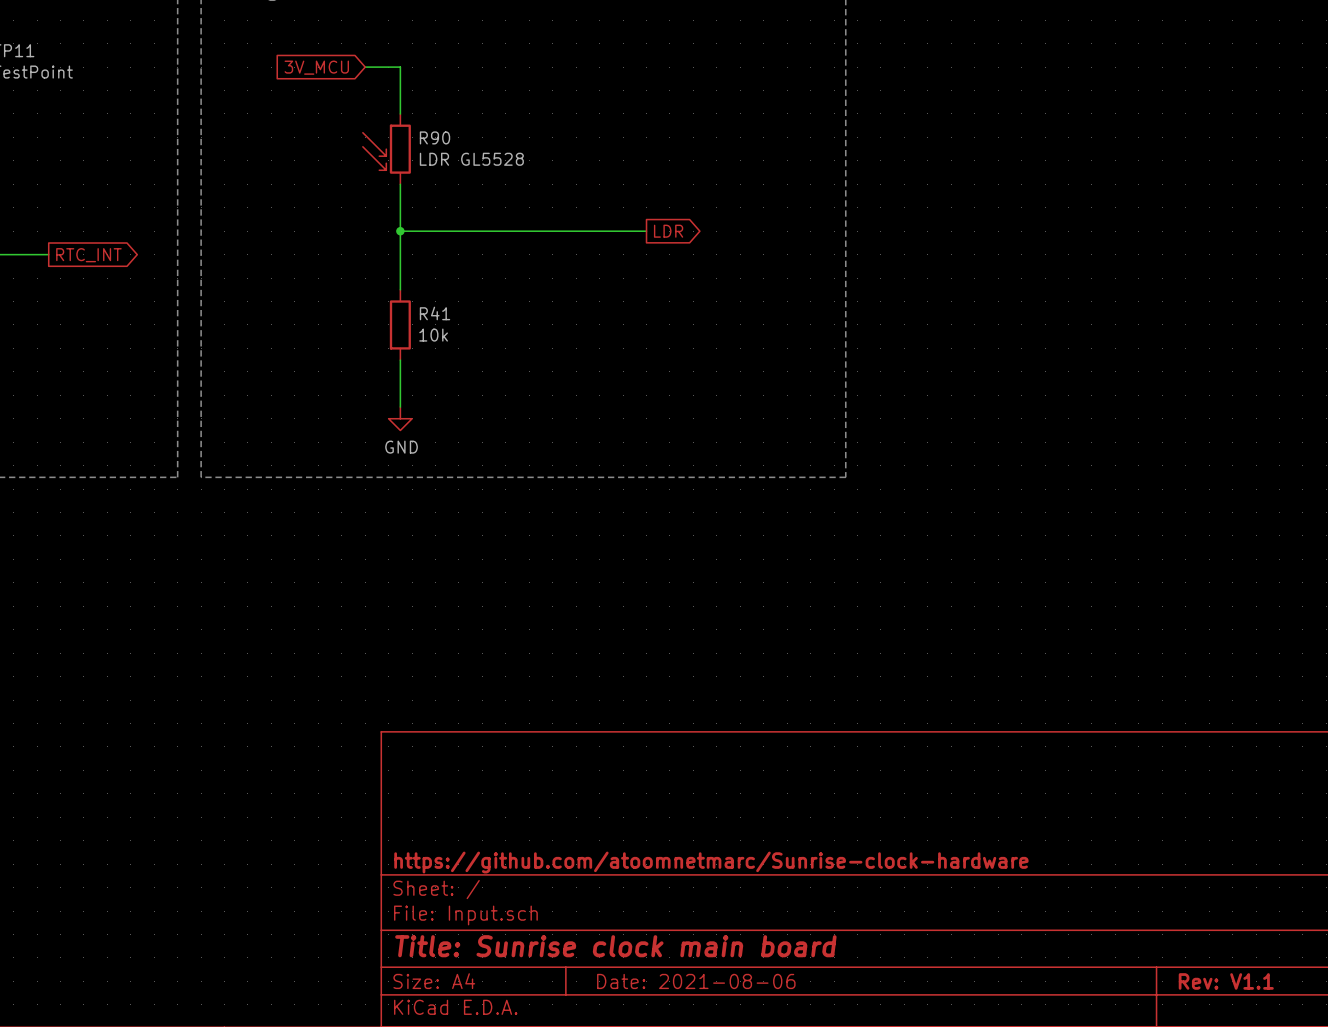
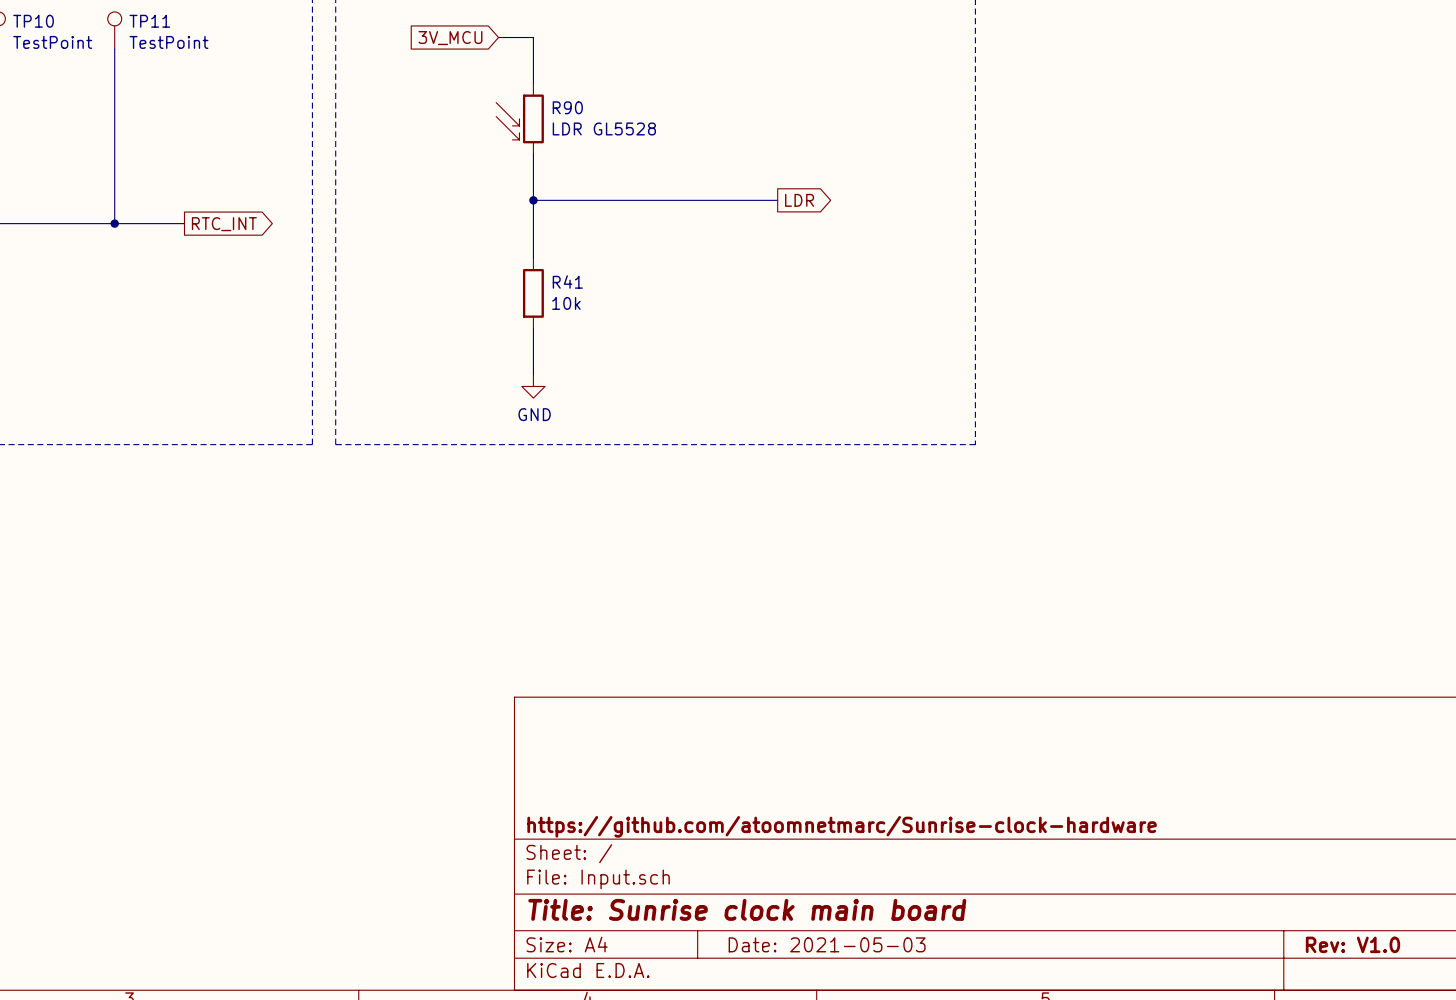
title block: Date: 2021-08-06 (696, 981) -> Date: 2021-05-03 (827, 944)
title block: Rev: V1.1 (1226, 981) -> Rev: V1.0 (1352, 944)

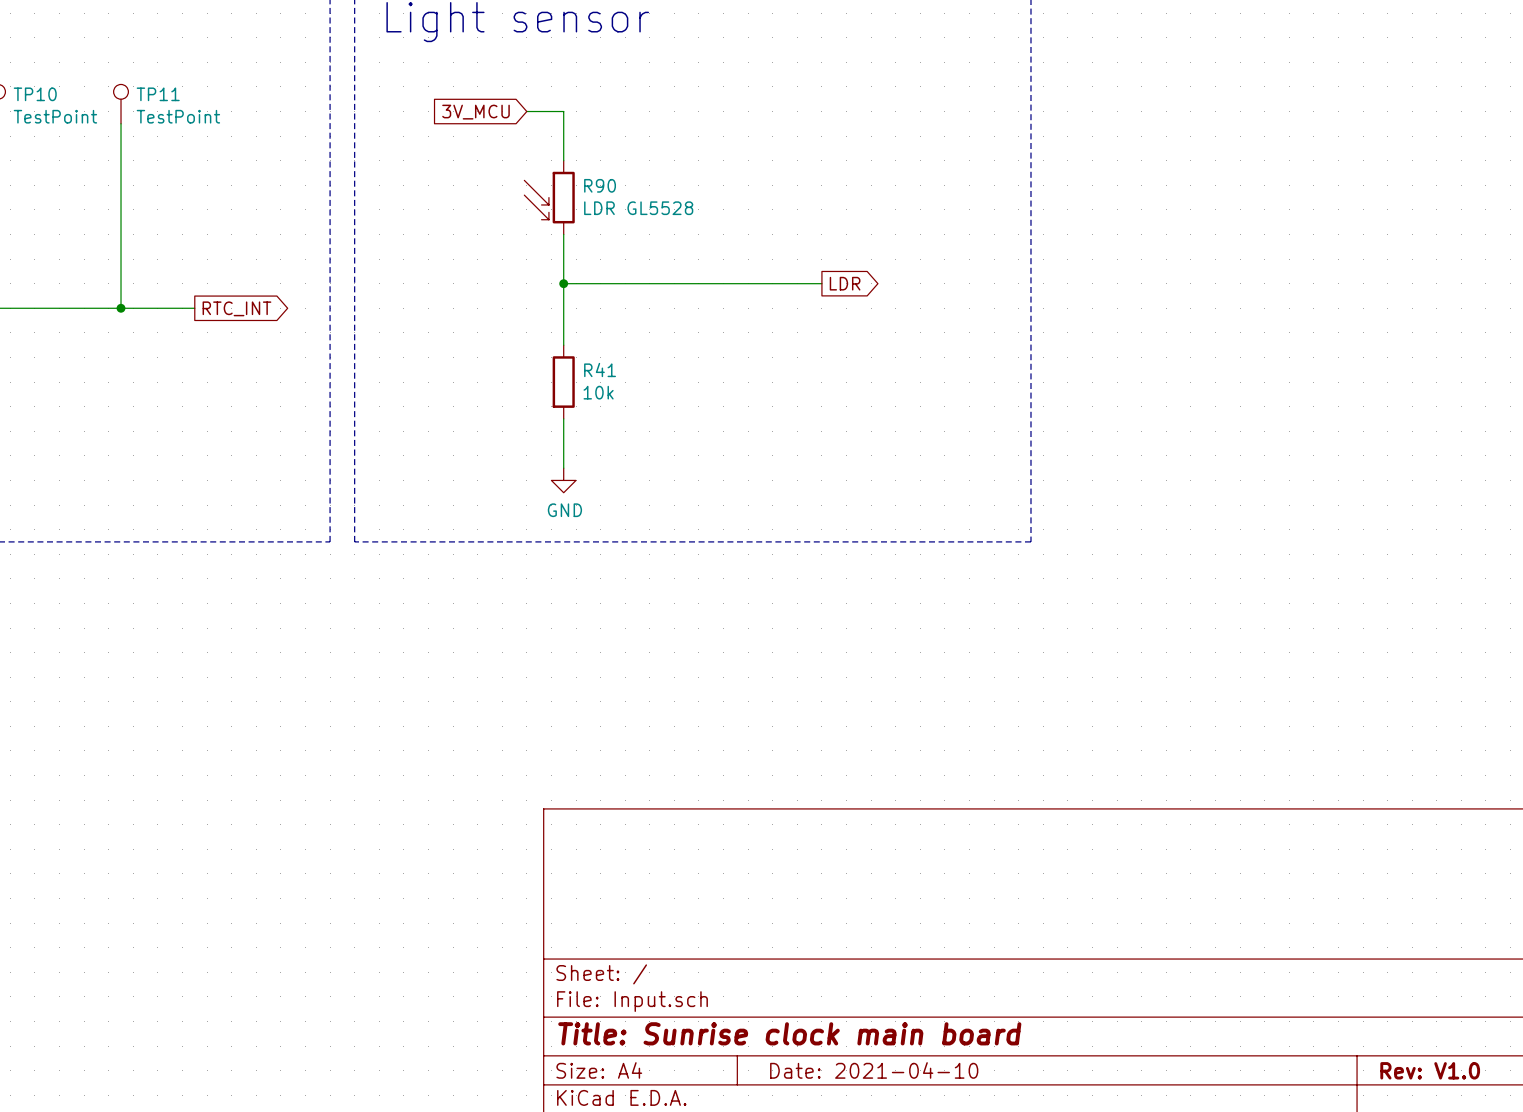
title block: https://github.com/atoomnetmarc/Sunrise-clock-hardware (842, 826) -> none
title block: Date: 2021-05-03 (827, 944) -> Date: 2021-04-10 (874, 1070)

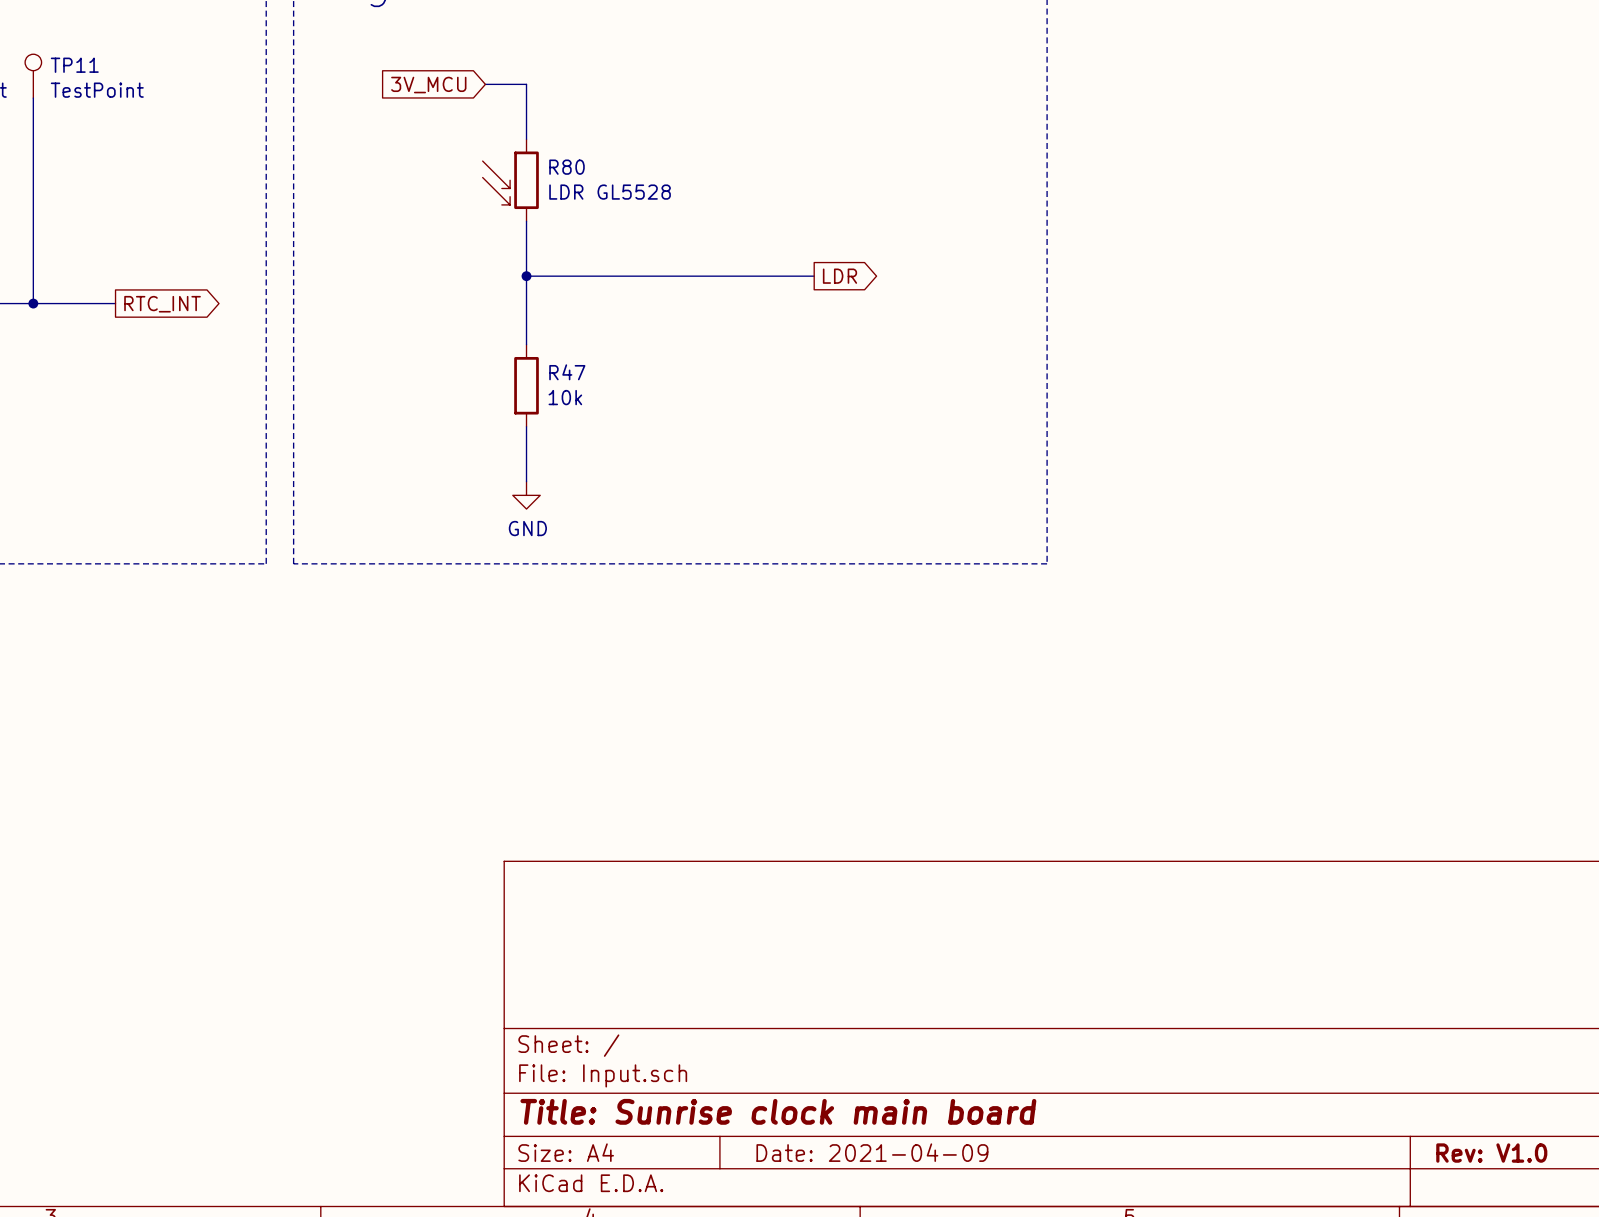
R90 name: R90 (600, 185) -> R80 (566, 167)
R41 name: R41 (600, 369) -> R47 (567, 372)
title block: Date: 2021-04-10 (874, 1070) -> Date: 2021-04-09 (872, 1152)

